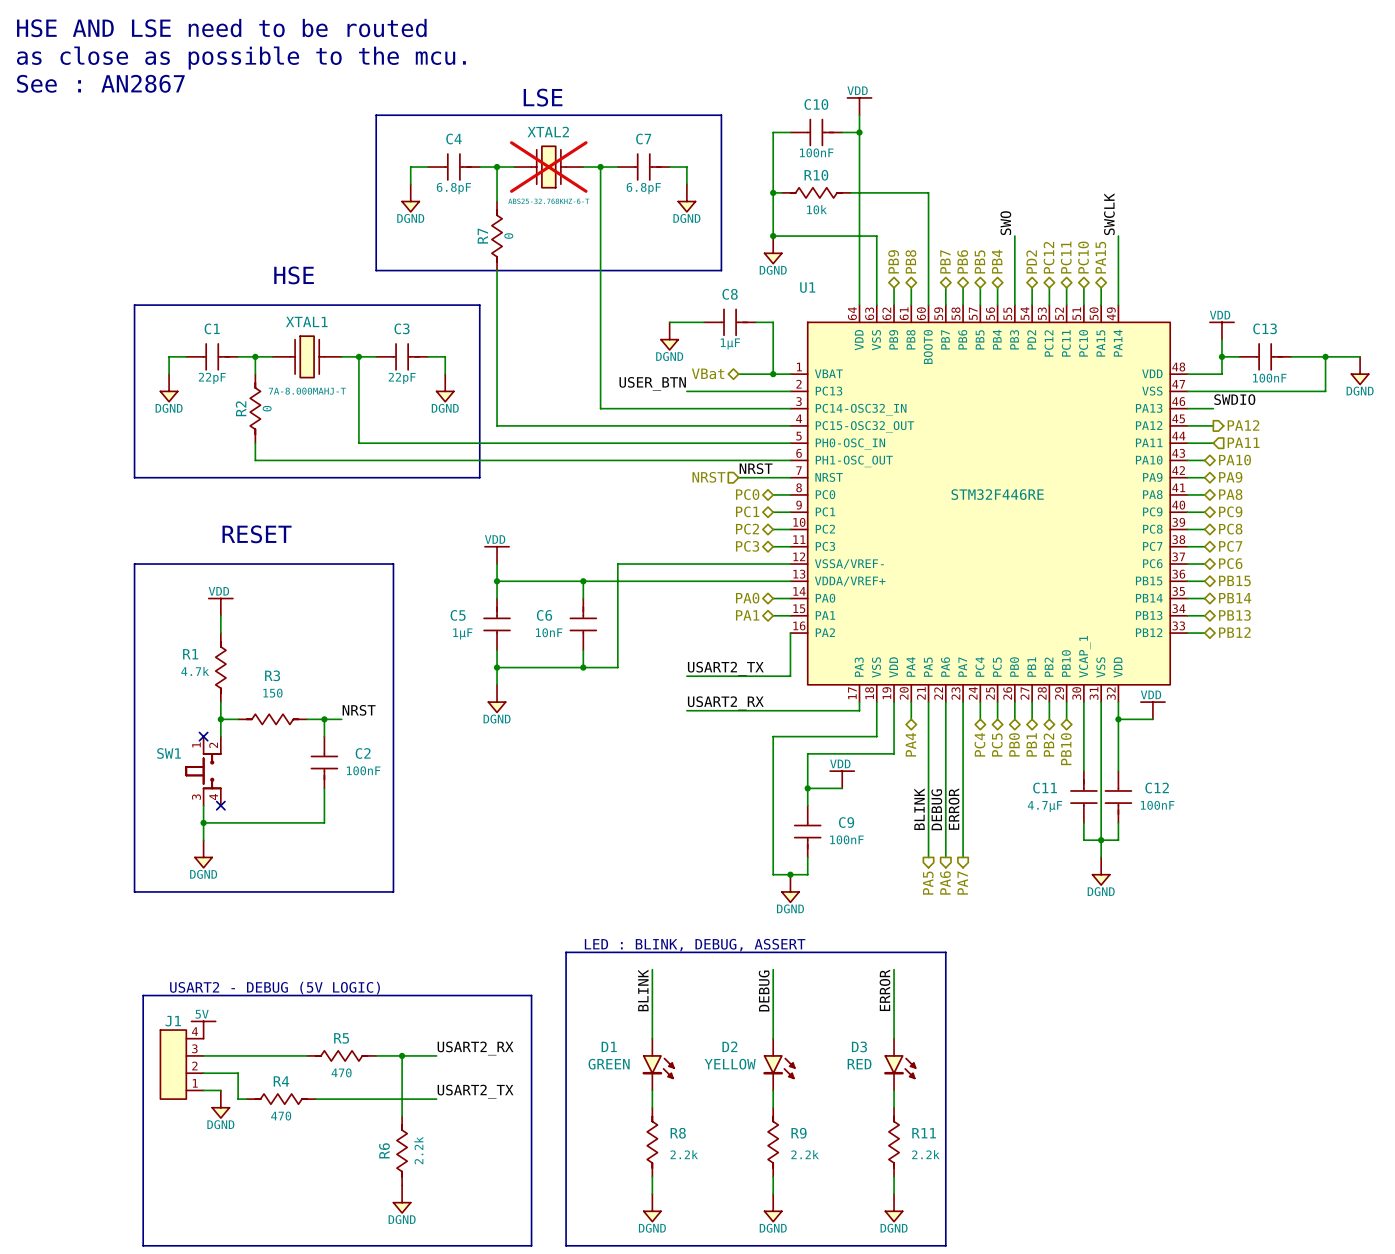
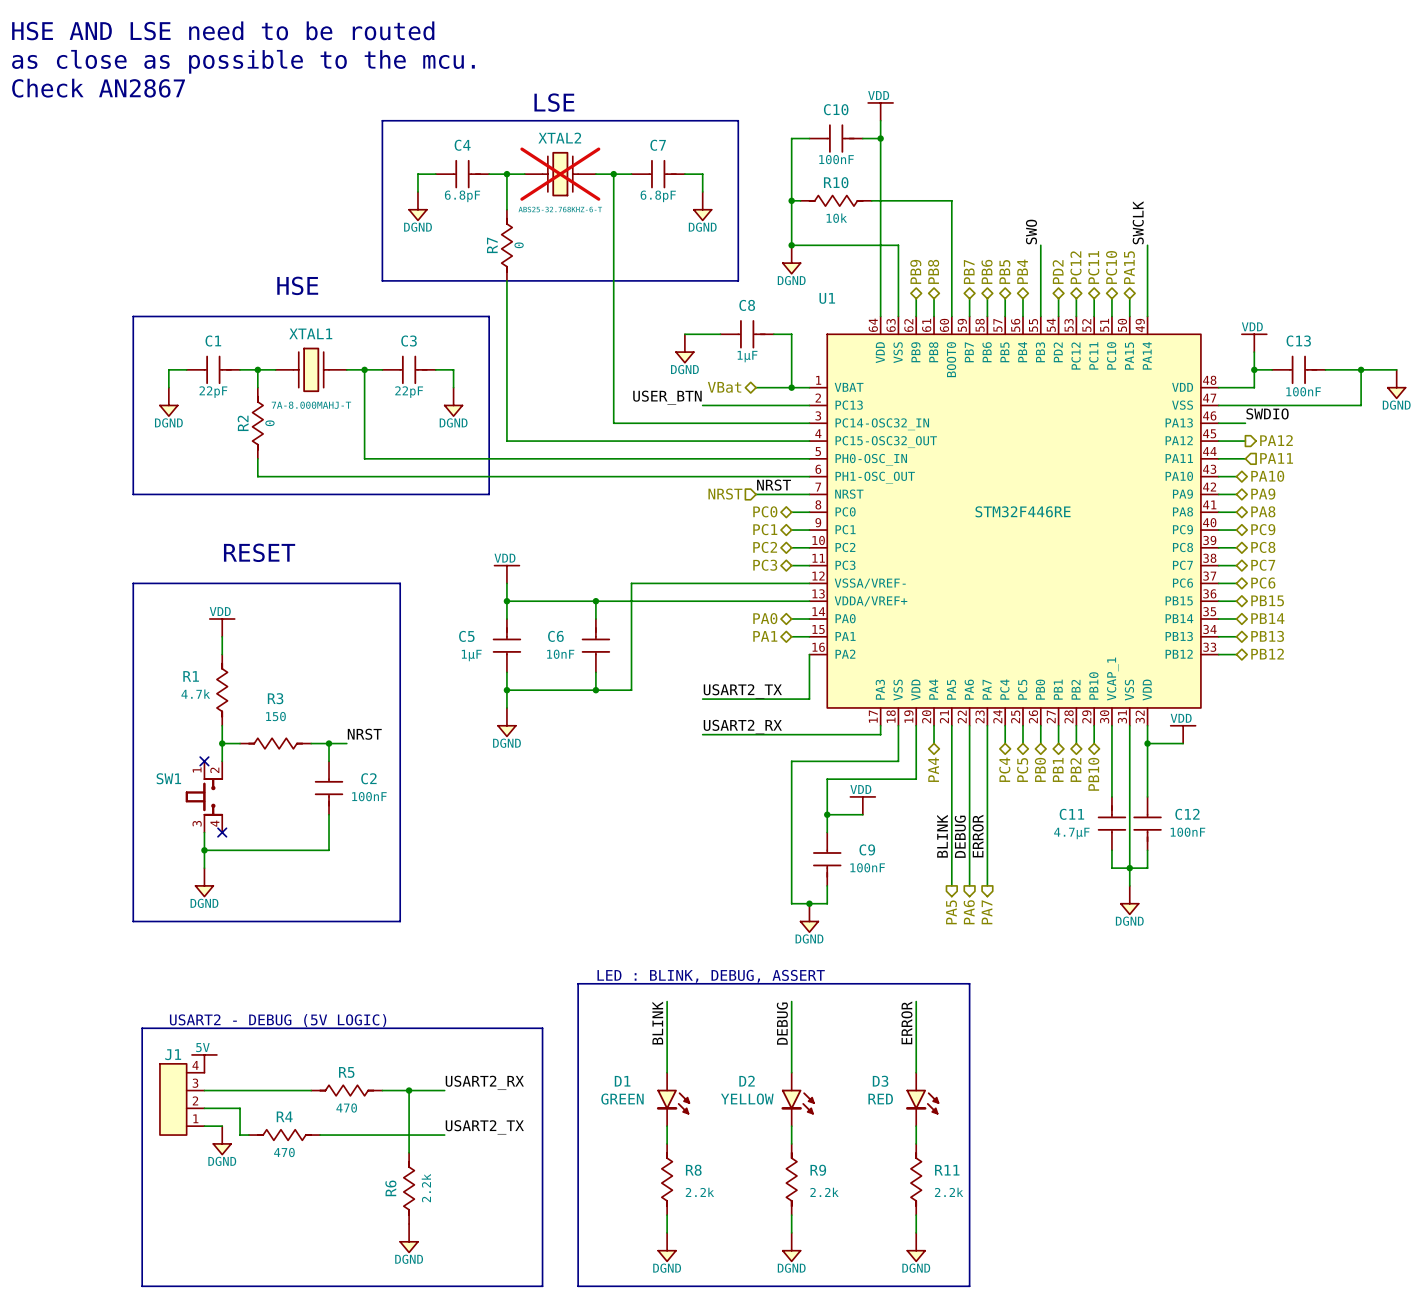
text: See : AN2867 (100, 83) -> Check AN2867 (98, 88)

